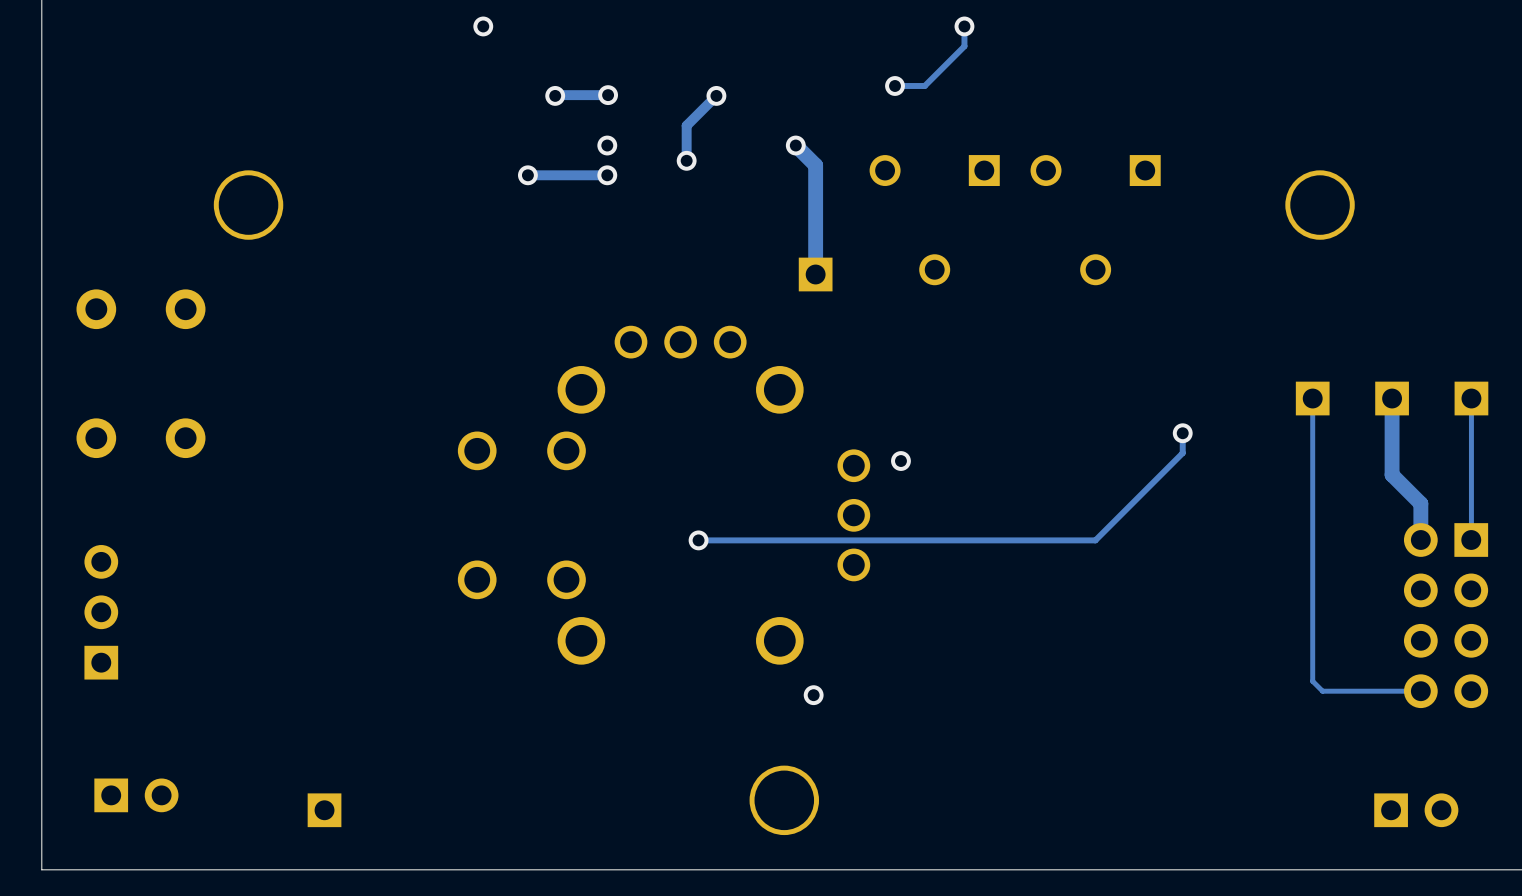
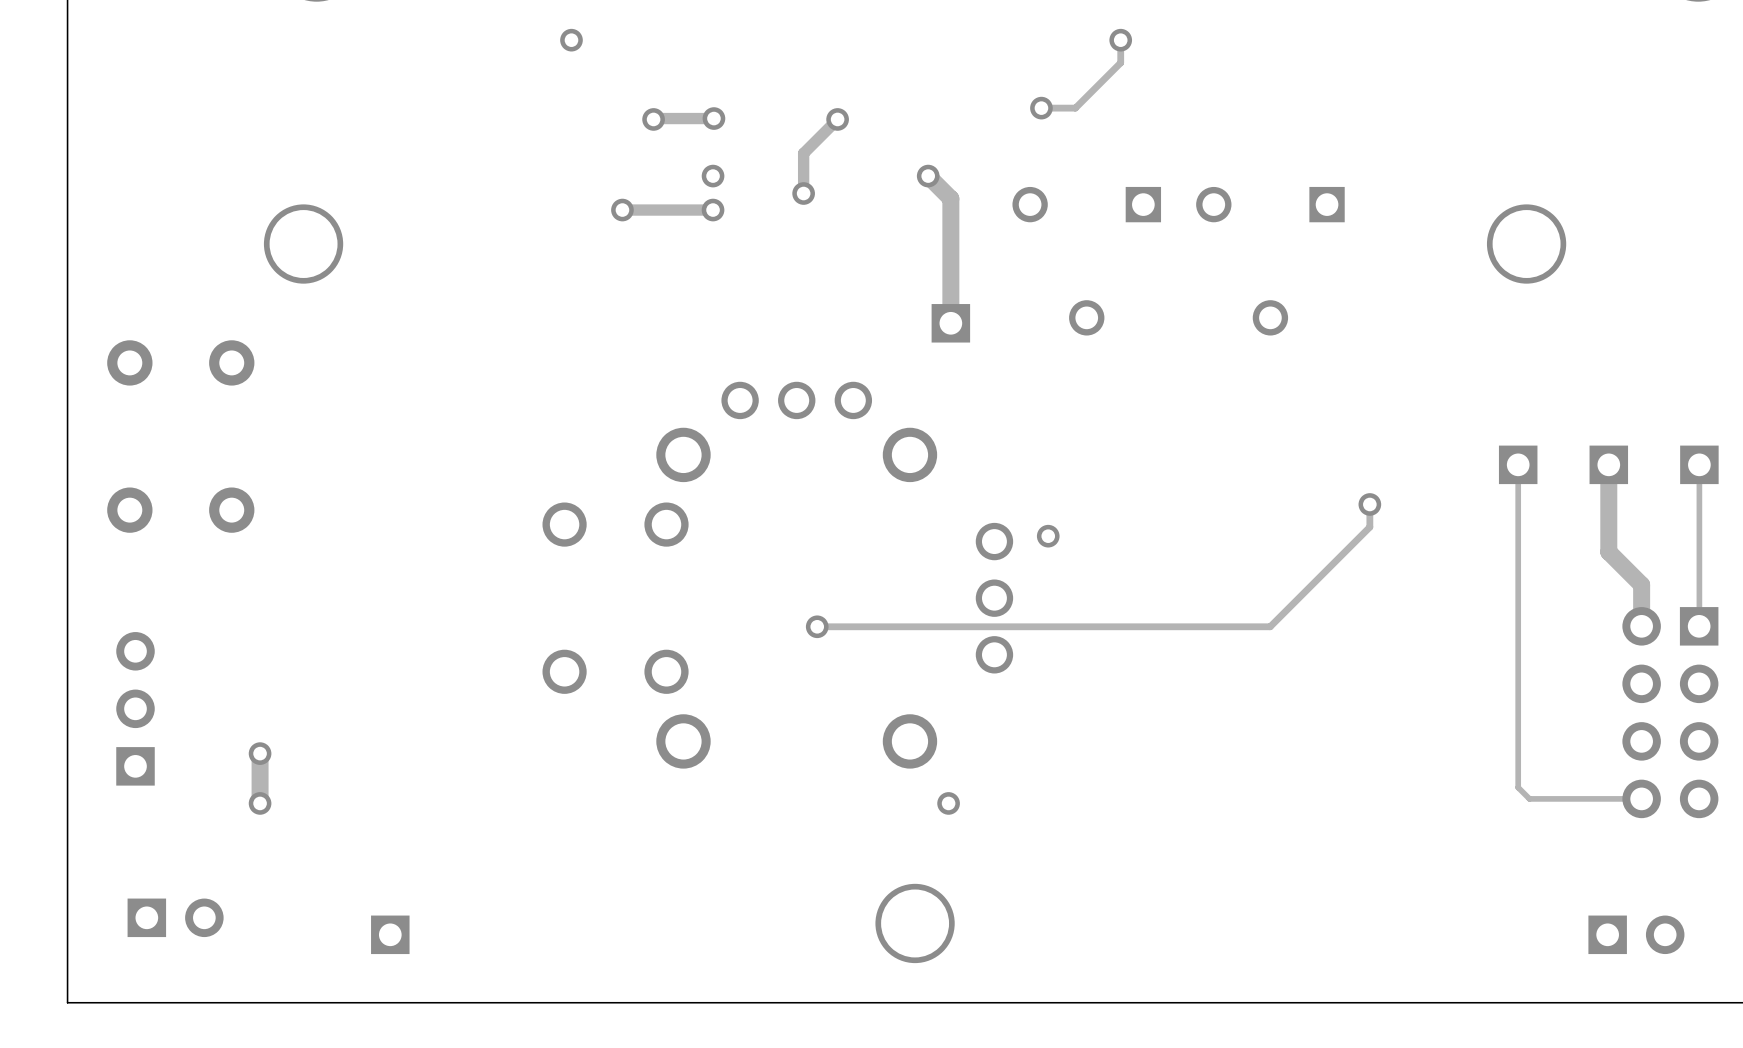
track: none -> (260, 753) (260, 803)
via: none -> (260, 753)
via: none -> (260, 803)

